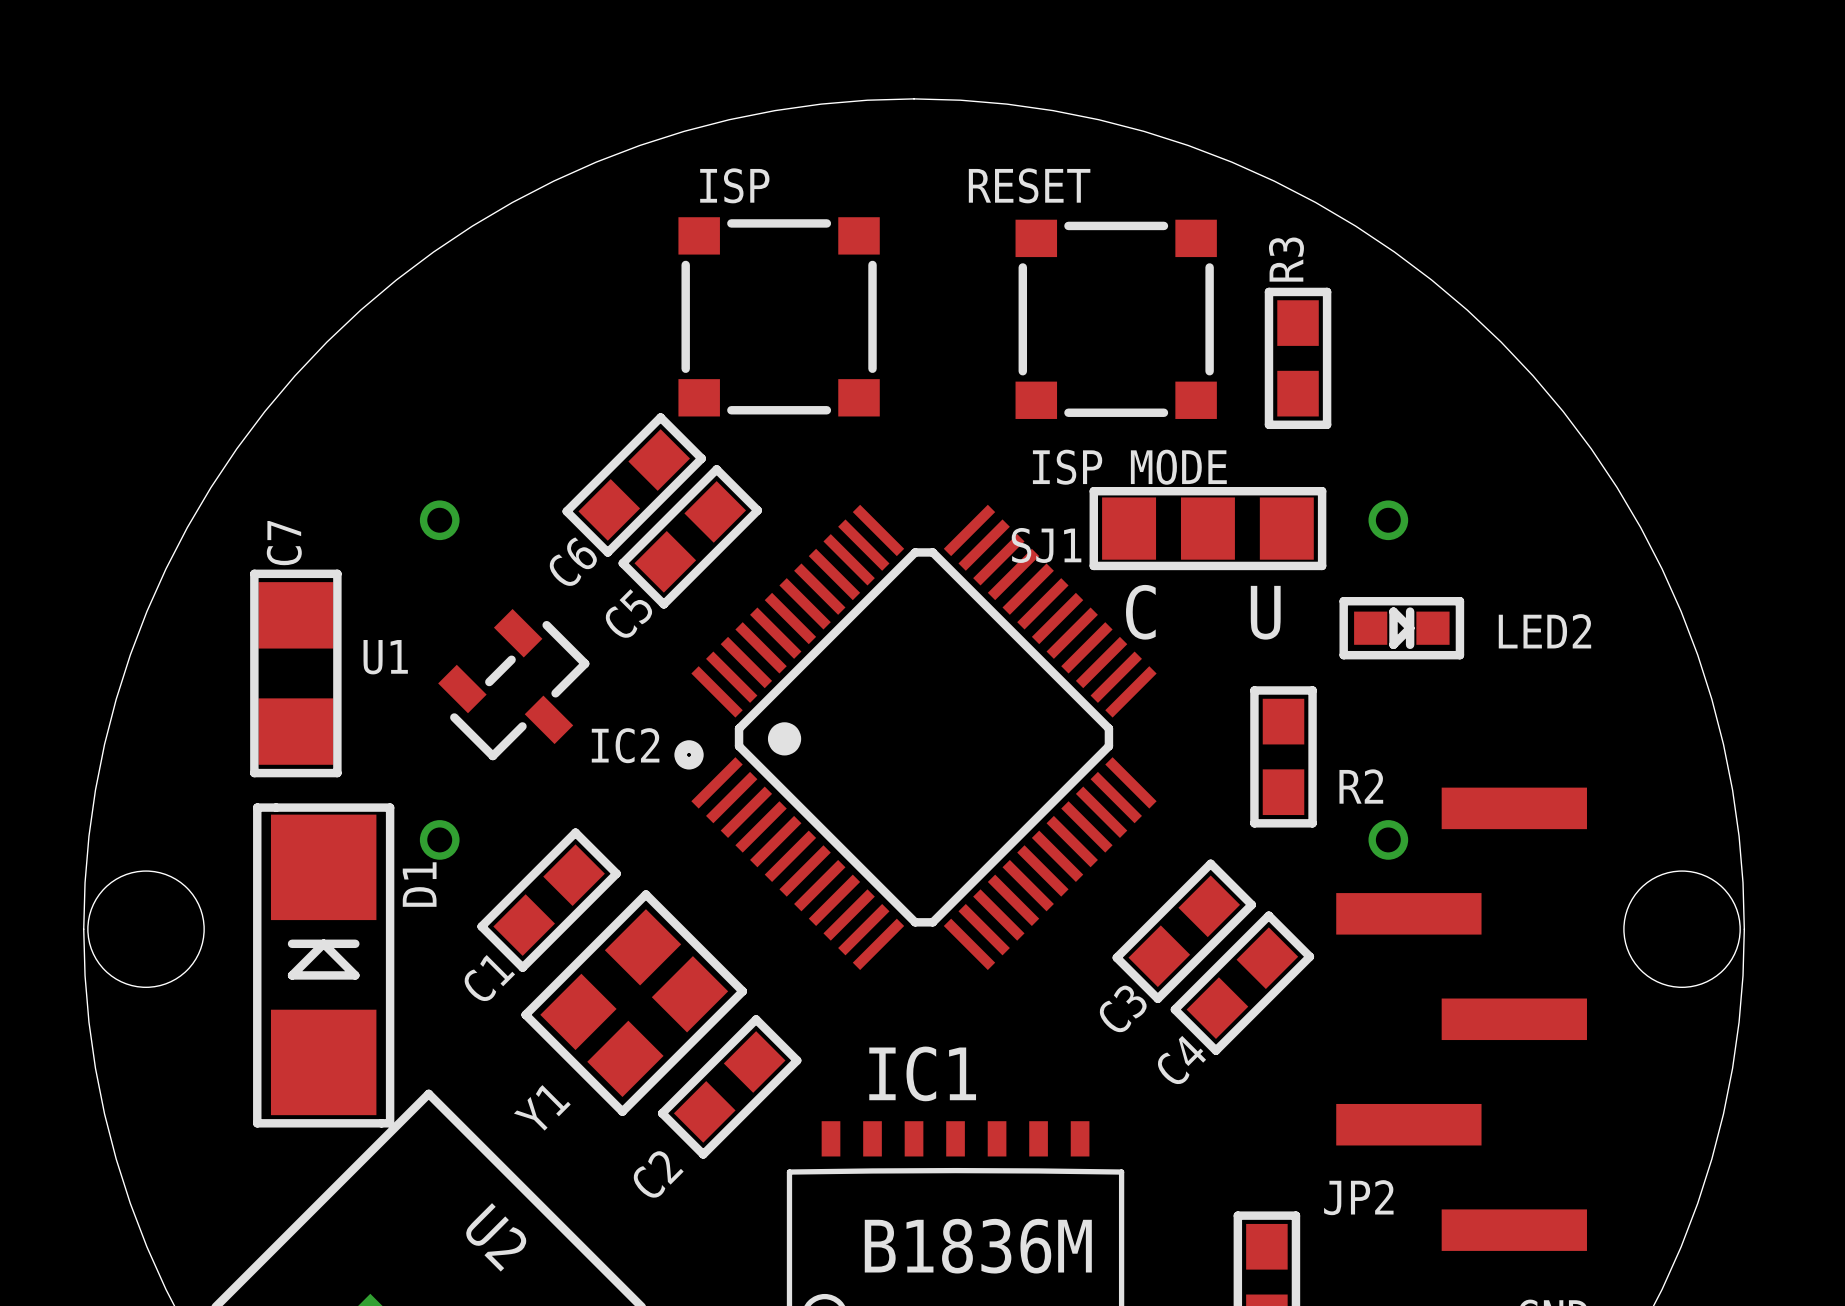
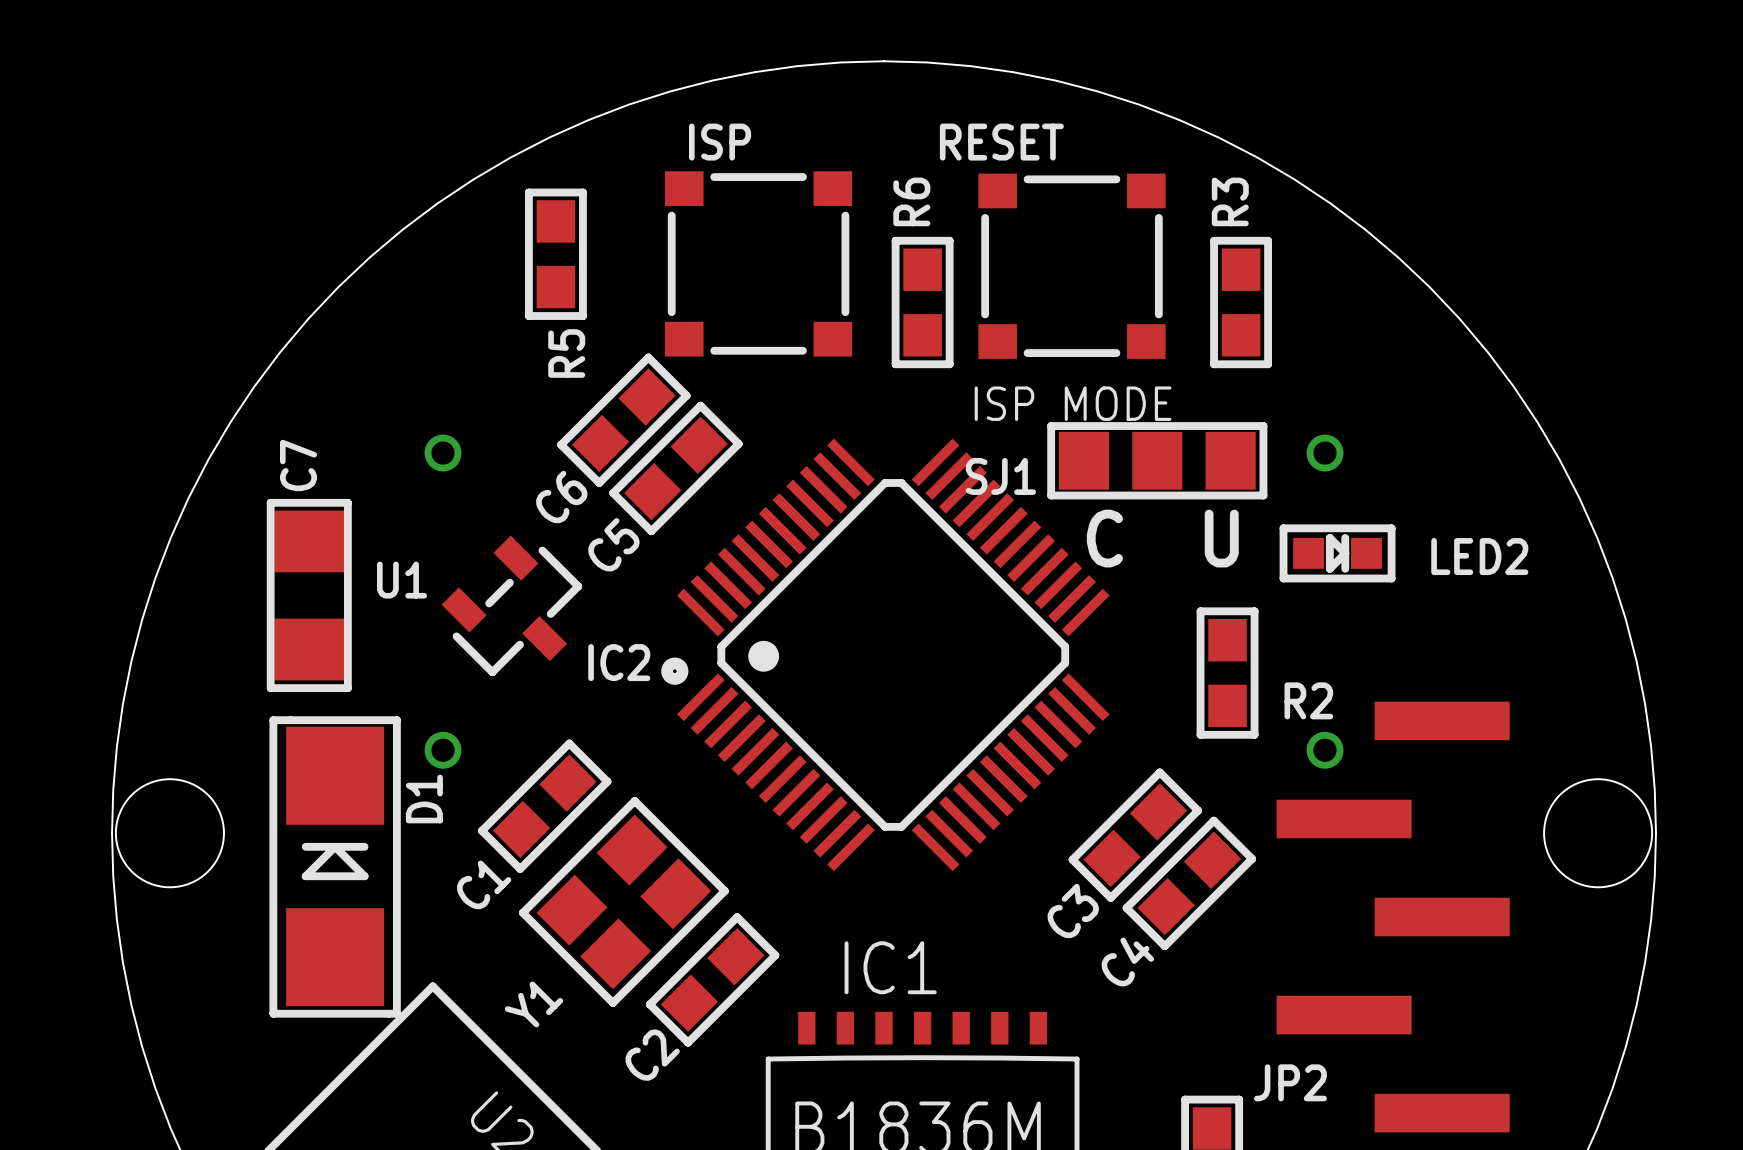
R5: none -> (555, 254)
R6: none -> (922, 302)

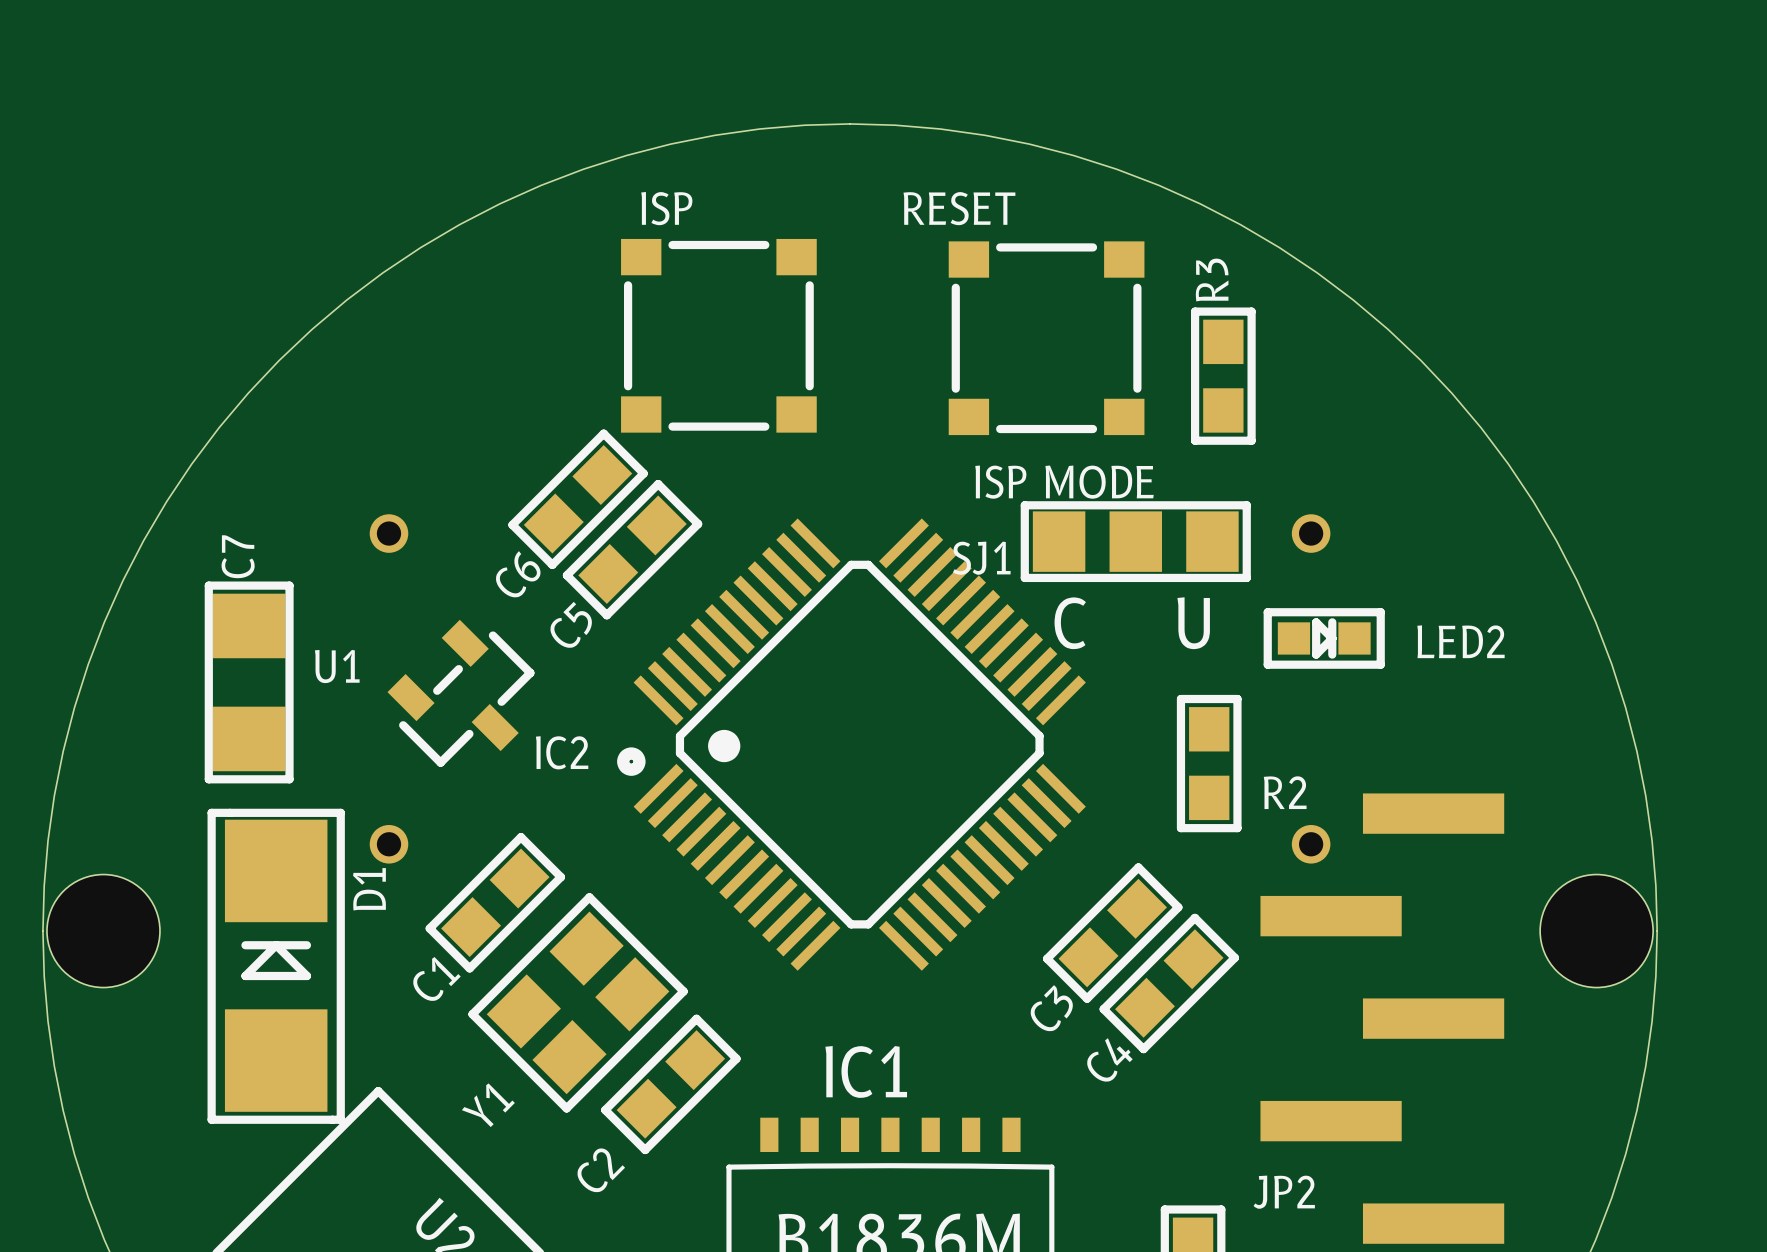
R5: (555, 254) -> none
R6: (922, 302) -> none

